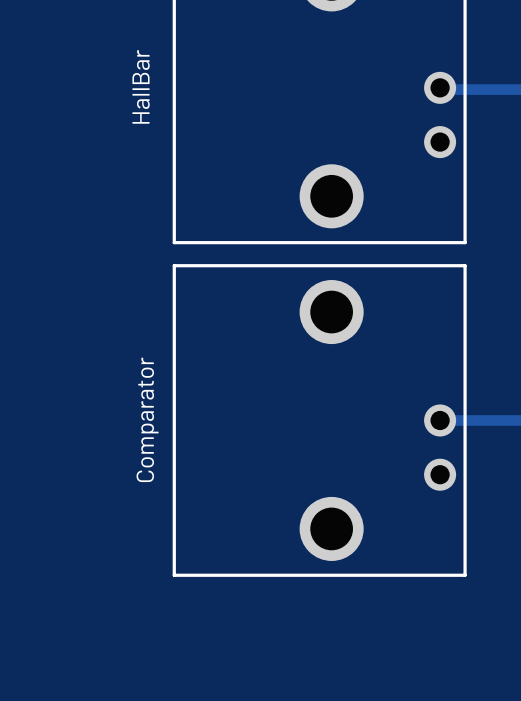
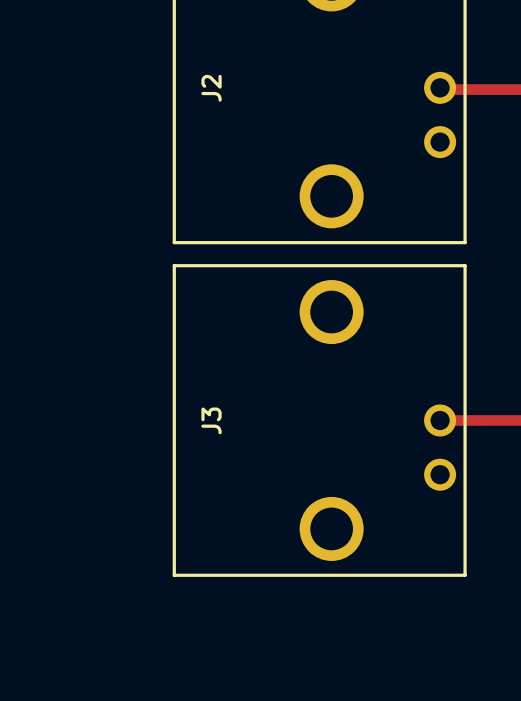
HallBar name: HallBar (141, 86) -> J2 (211, 88)
Comparator name: Comparator (147, 419) -> J3 (211, 420)

